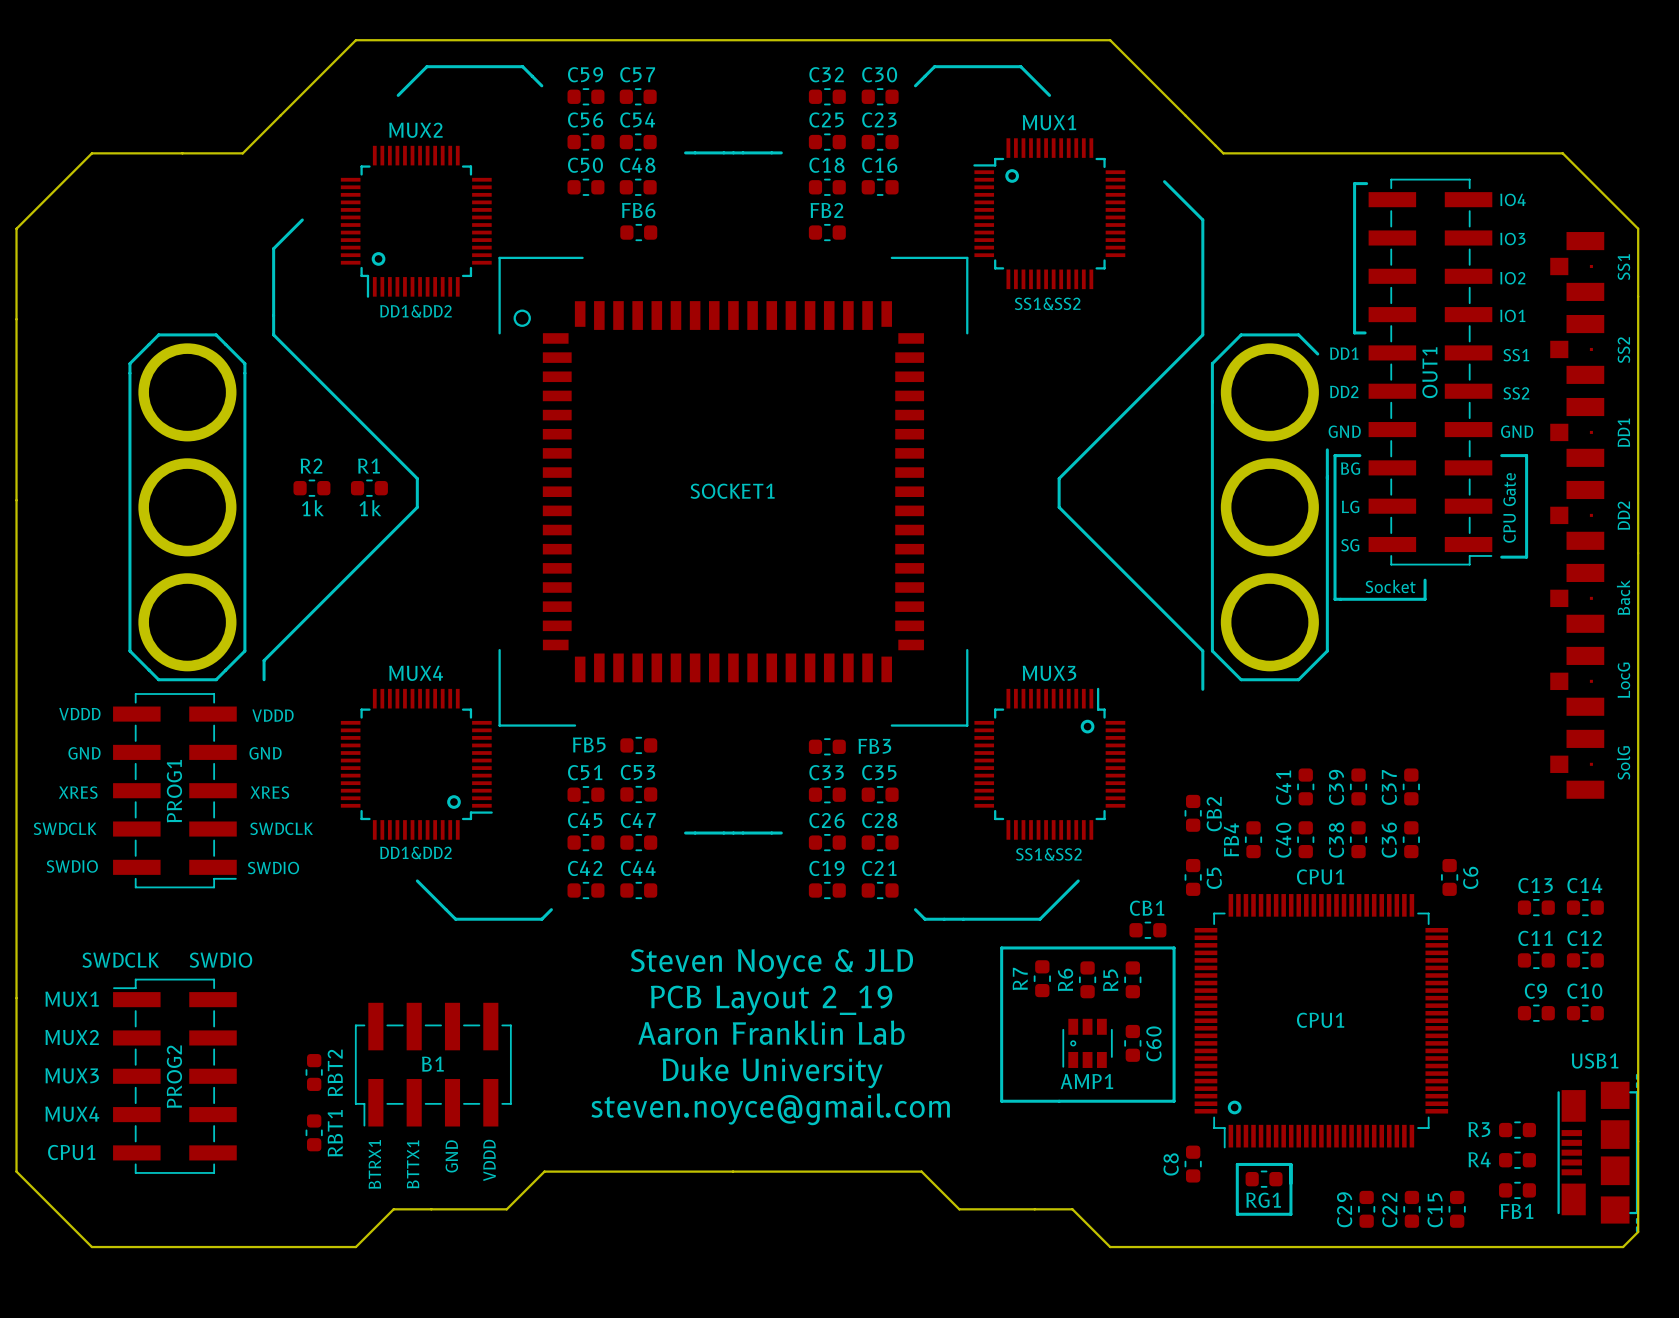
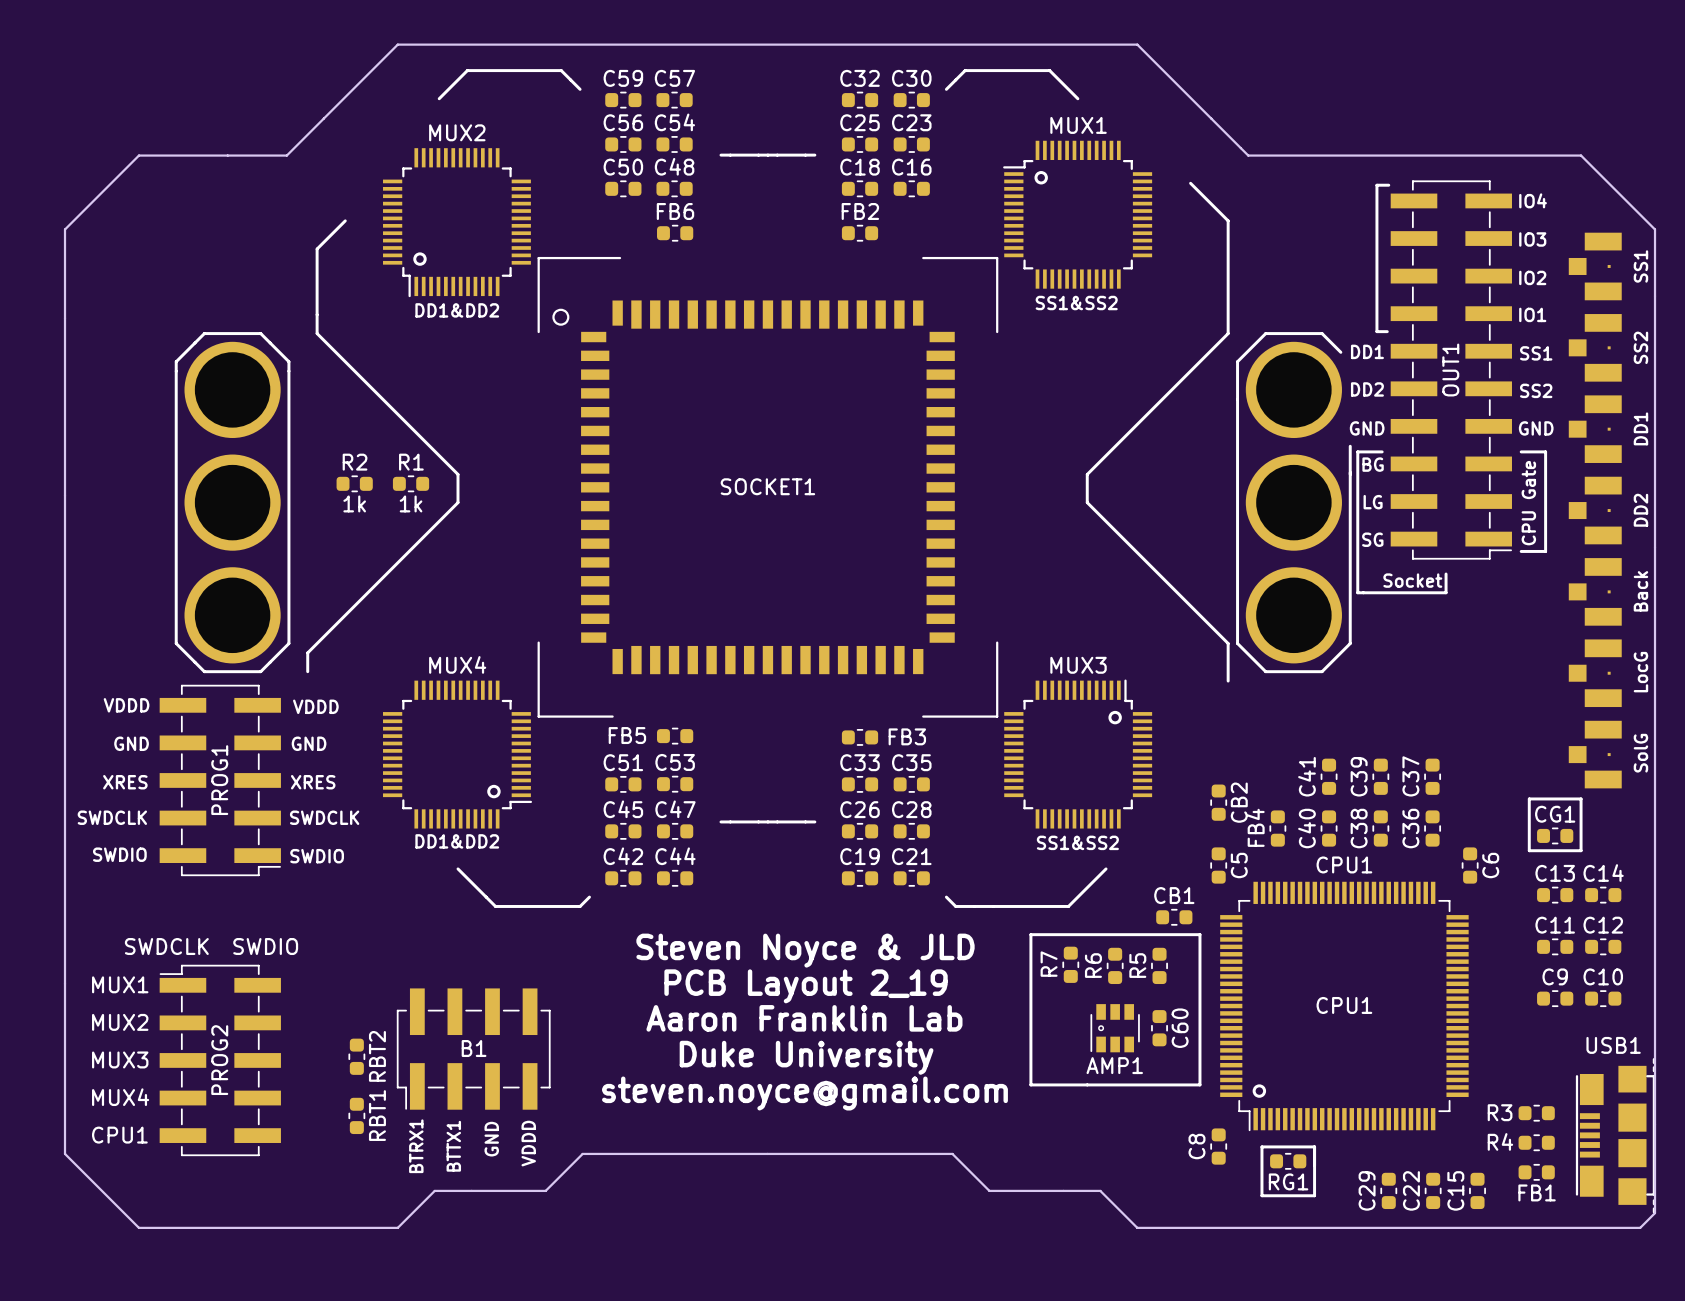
line: none -> (1529, 798) (1529, 850) (1581, 850) (1581, 798) (1529, 798)
CG1: none -> (1555, 835)

